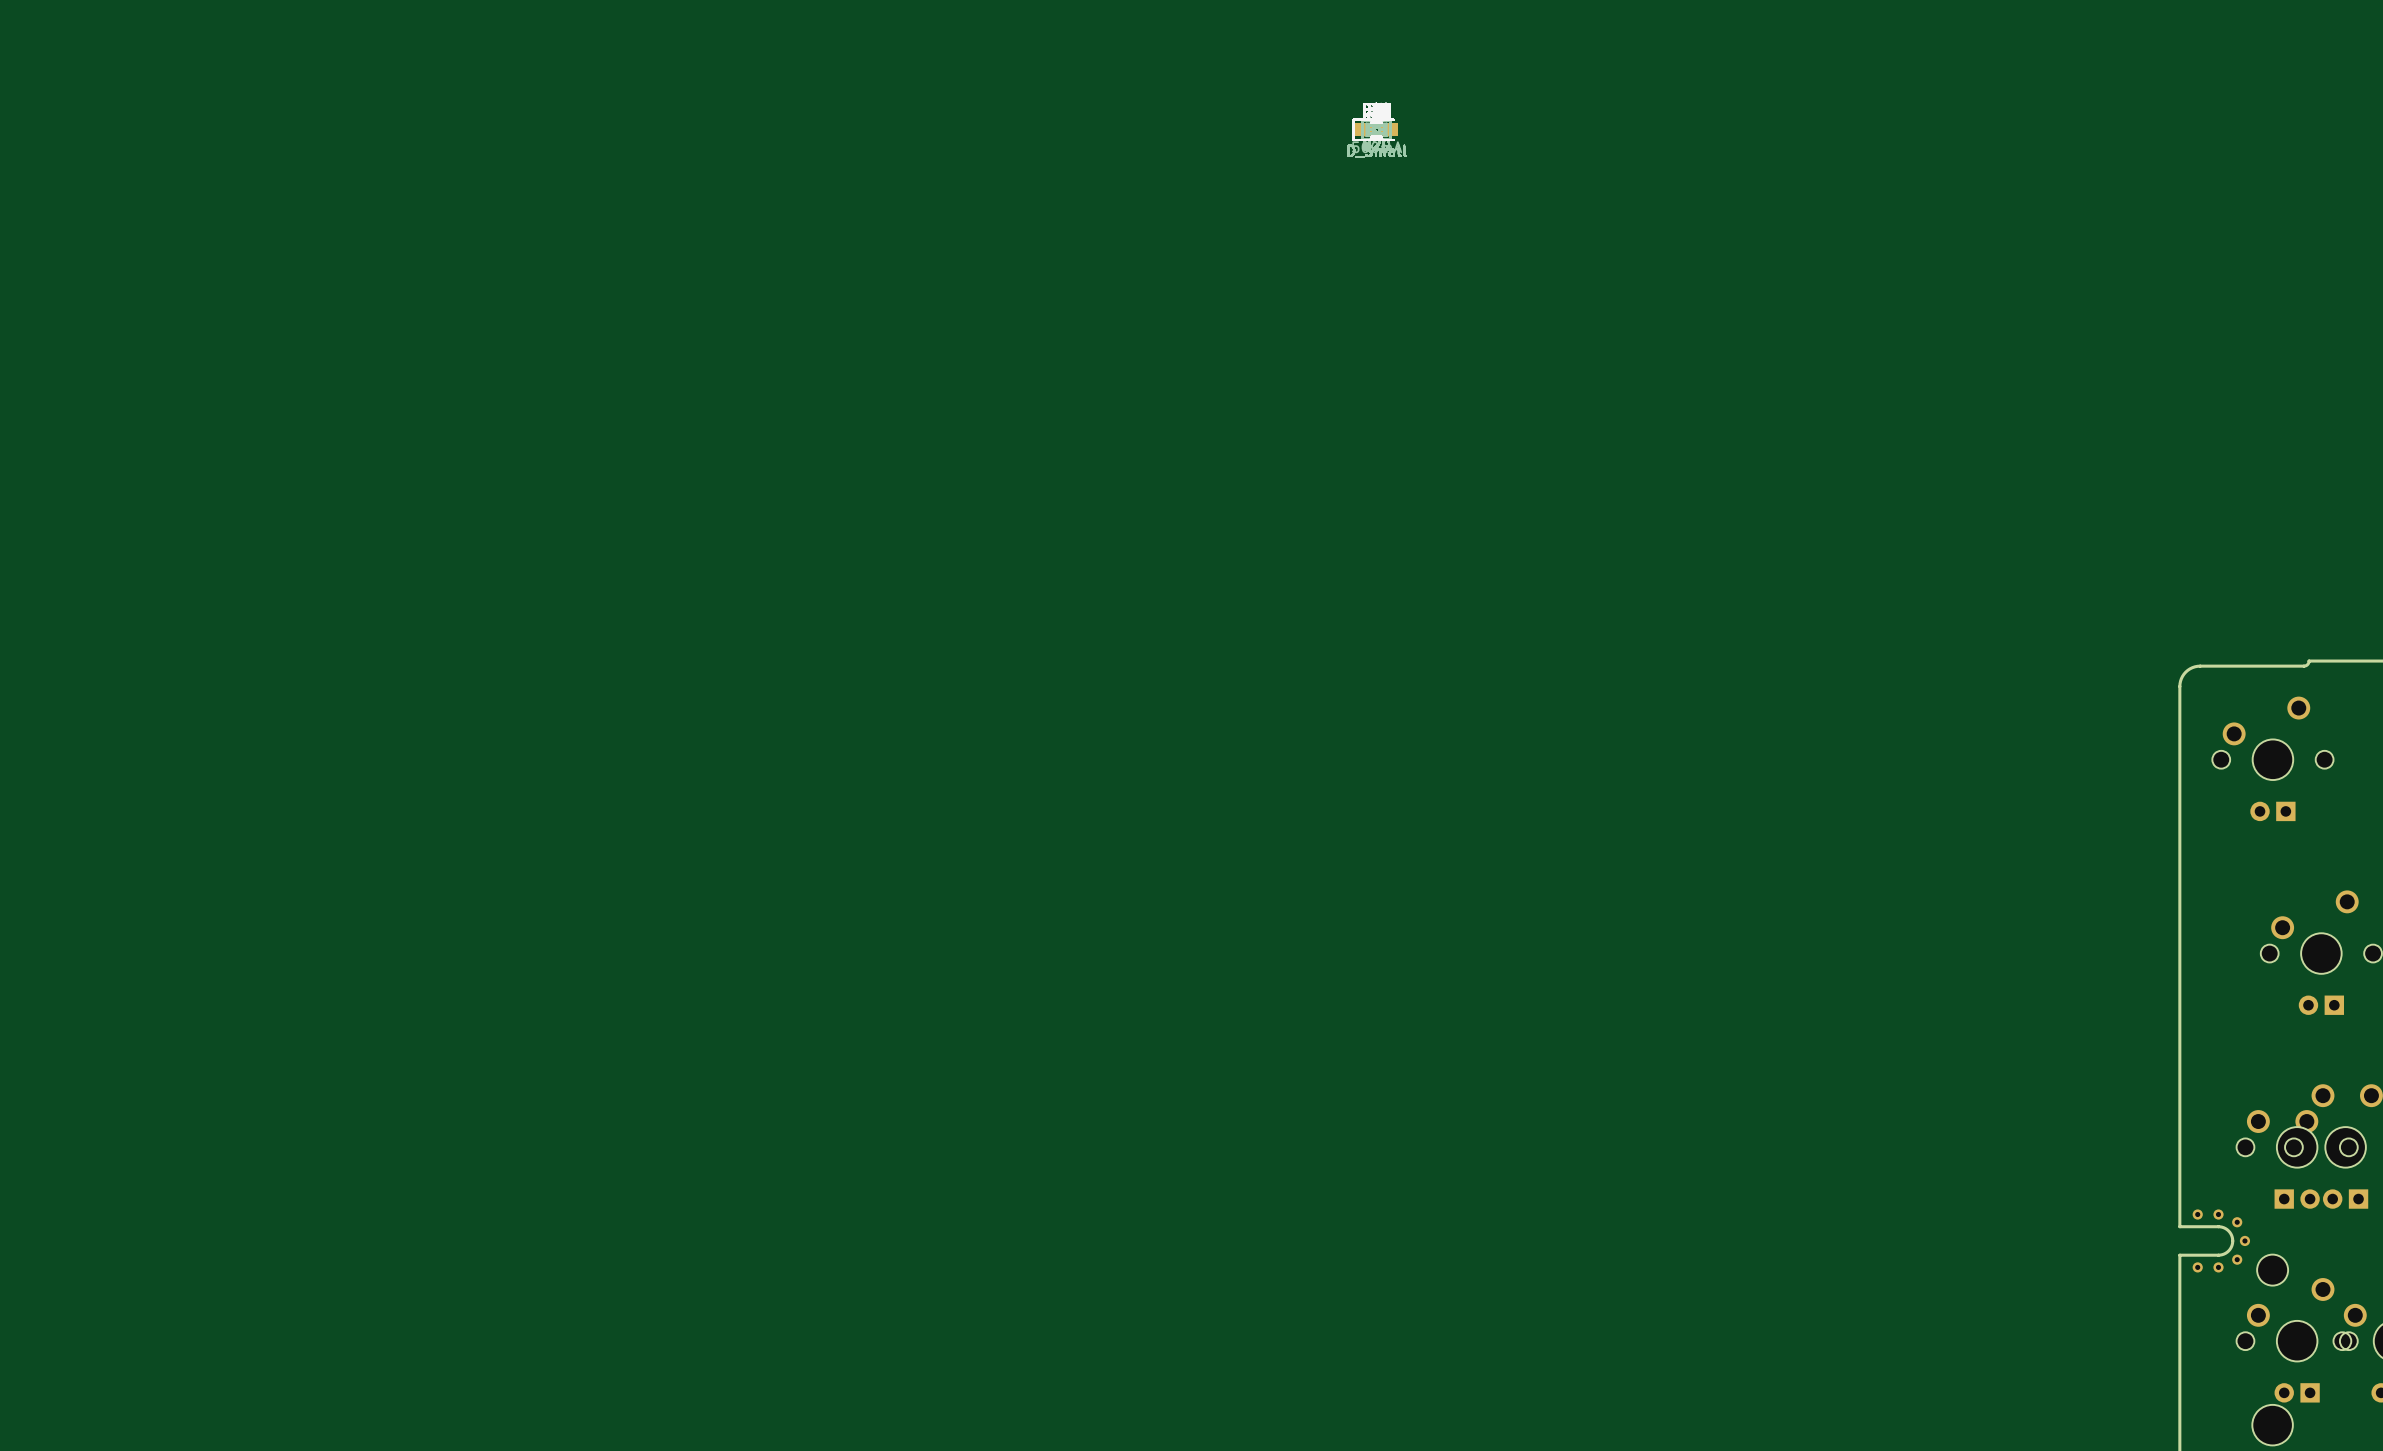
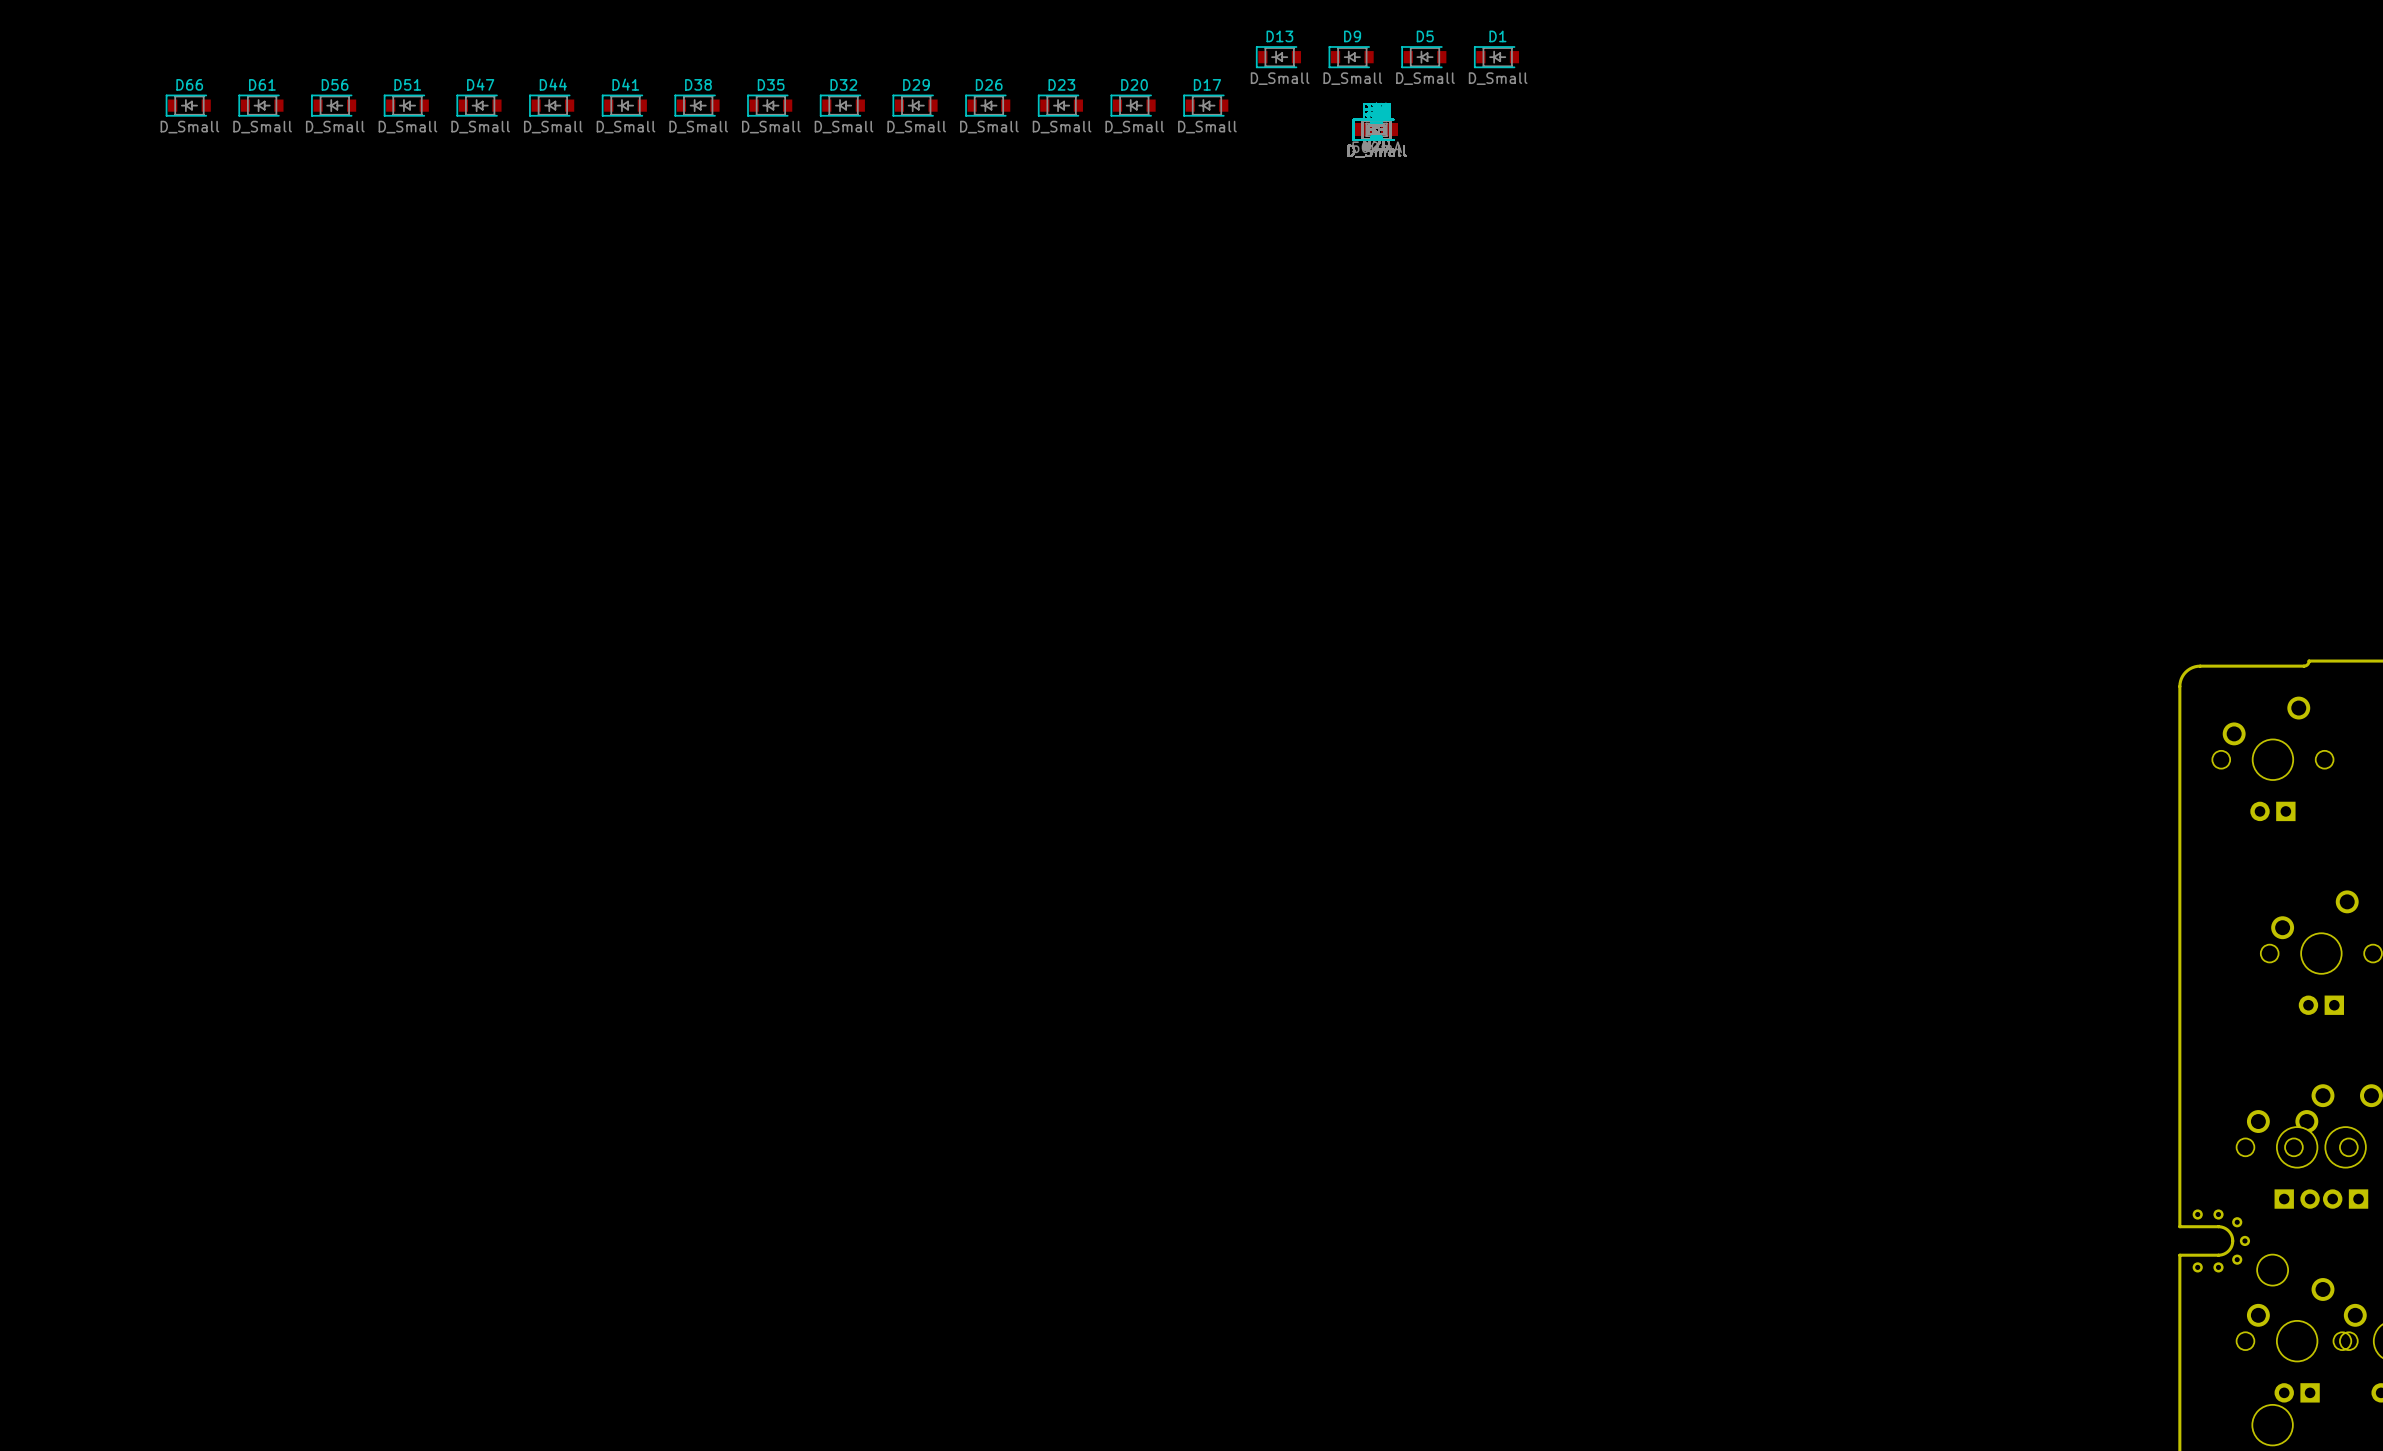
D1 position: (1375, 129) -> (1496, 57)
D5 position: (1375, 129) -> (1423, 57)
D9 position: (1375, 129) -> (1351, 57)
D13 position: (1375, 129) -> (1278, 57)
D17 position: (1375, 129) -> (1205, 105)
D20 position: (1375, 129) -> (1133, 105)
D23 position: (1375, 129) -> (1060, 105)
D26 position: (1375, 129) -> (987, 105)
D29 position: (1375, 129) -> (915, 105)
D32 position: (1375, 129) -> (842, 105)
D35 position: (1375, 129) -> (769, 105)
D38 position: (1375, 129) -> (697, 105)
D41 position: (1375, 129) -> (624, 105)
D44 position: (1375, 129) -> (551, 105)
D47 position: (1375, 129) -> (479, 105)
D51 position: (1375, 129) -> (406, 105)
D56 position: (1375, 129) -> (333, 105)
D61 position: (1375, 129) -> (261, 105)
D66 position: (1375, 129) -> (188, 105)

